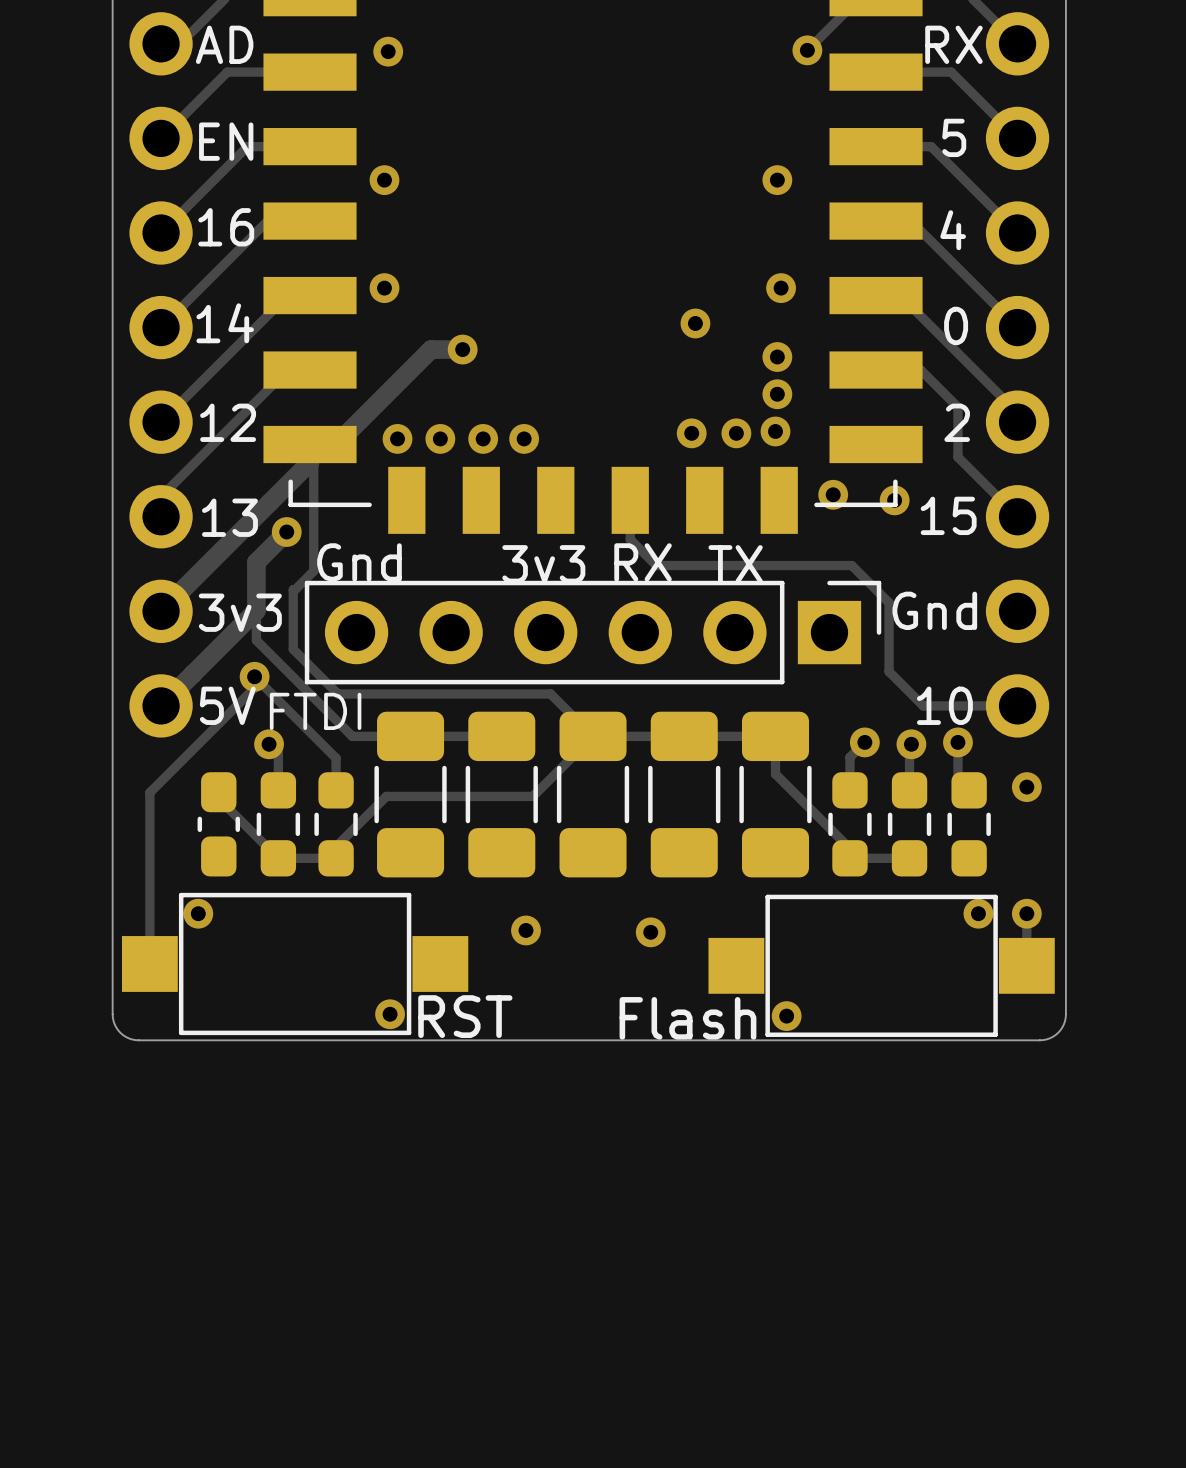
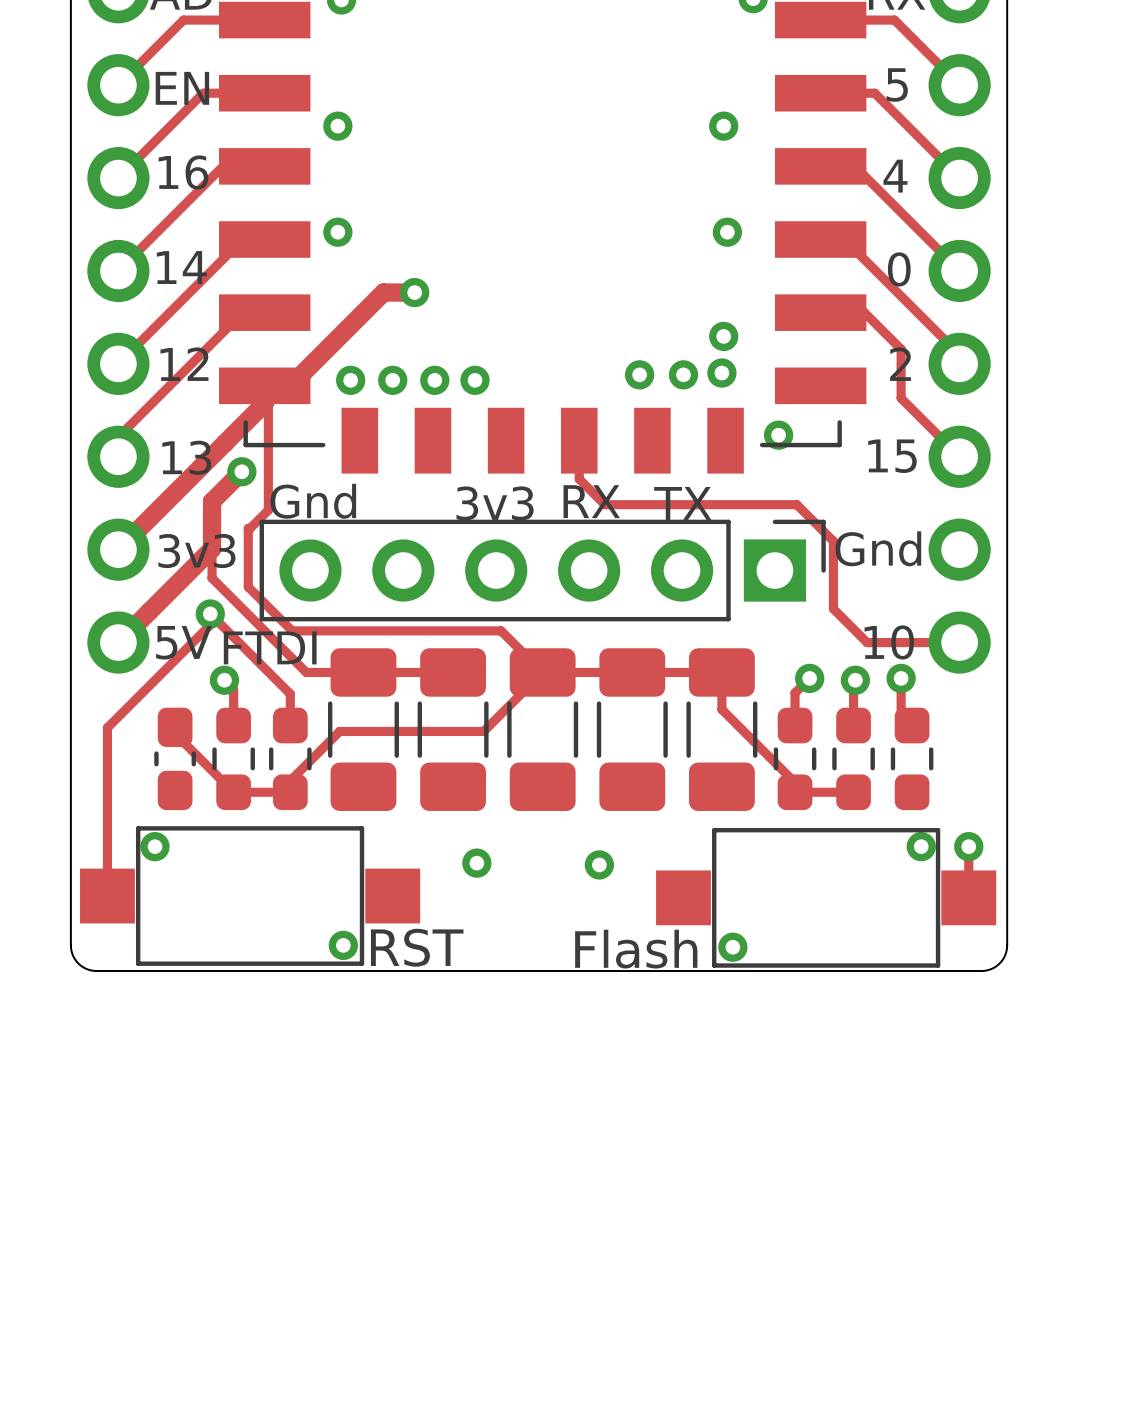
via: (695, 323) -> none
via: (777, 357) -> none
via: (894, 500) -> none
via: (1026, 787) -> none

